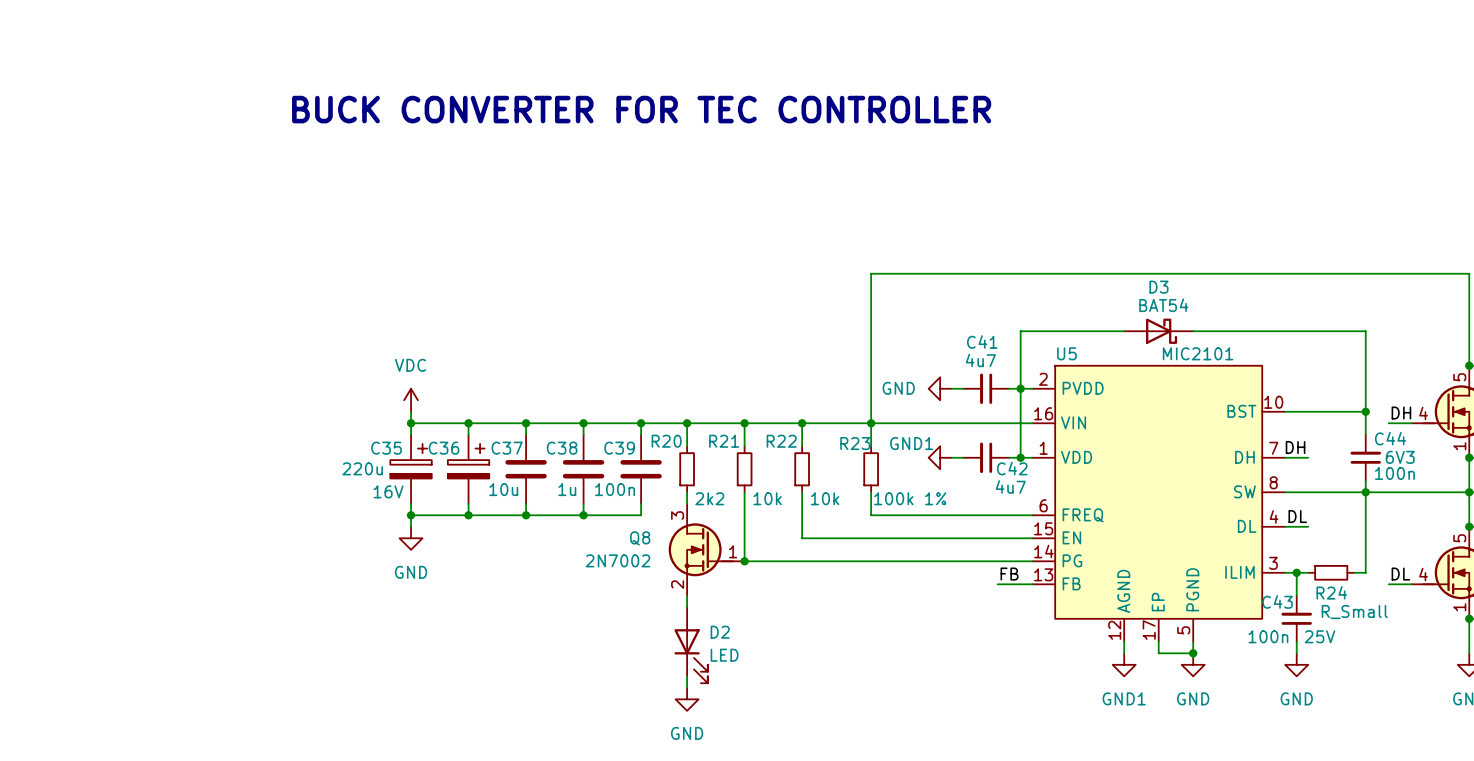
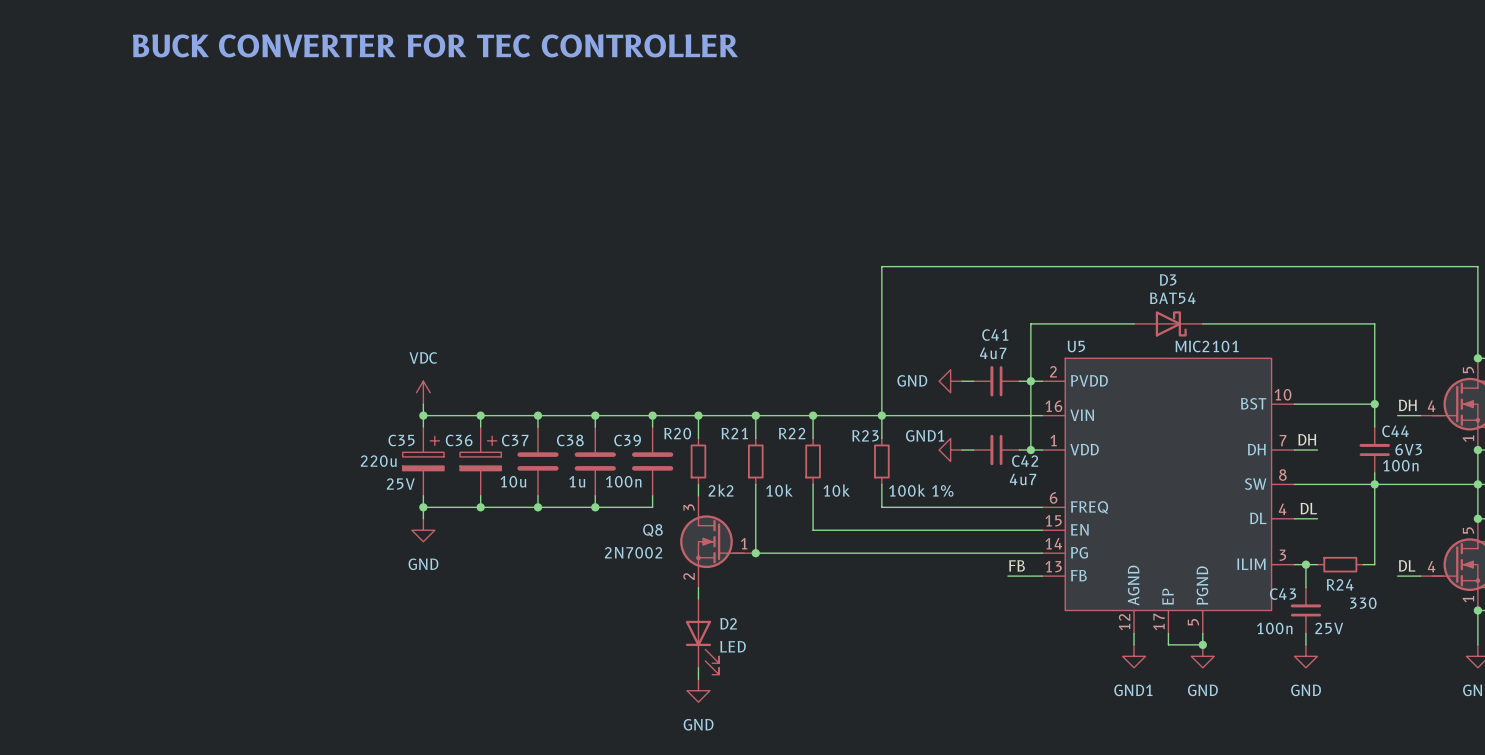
text position: BUCK CONVERTER FOR TEC CONTROLLER (641, 109) -> BUCK CONVERTER FOR TEC CONTROLLER (435, 45)
C35 text: 16V (388, 491) -> 25V (400, 484)
R24 value: R_Small (1354, 612) -> 330 (1363, 603)

